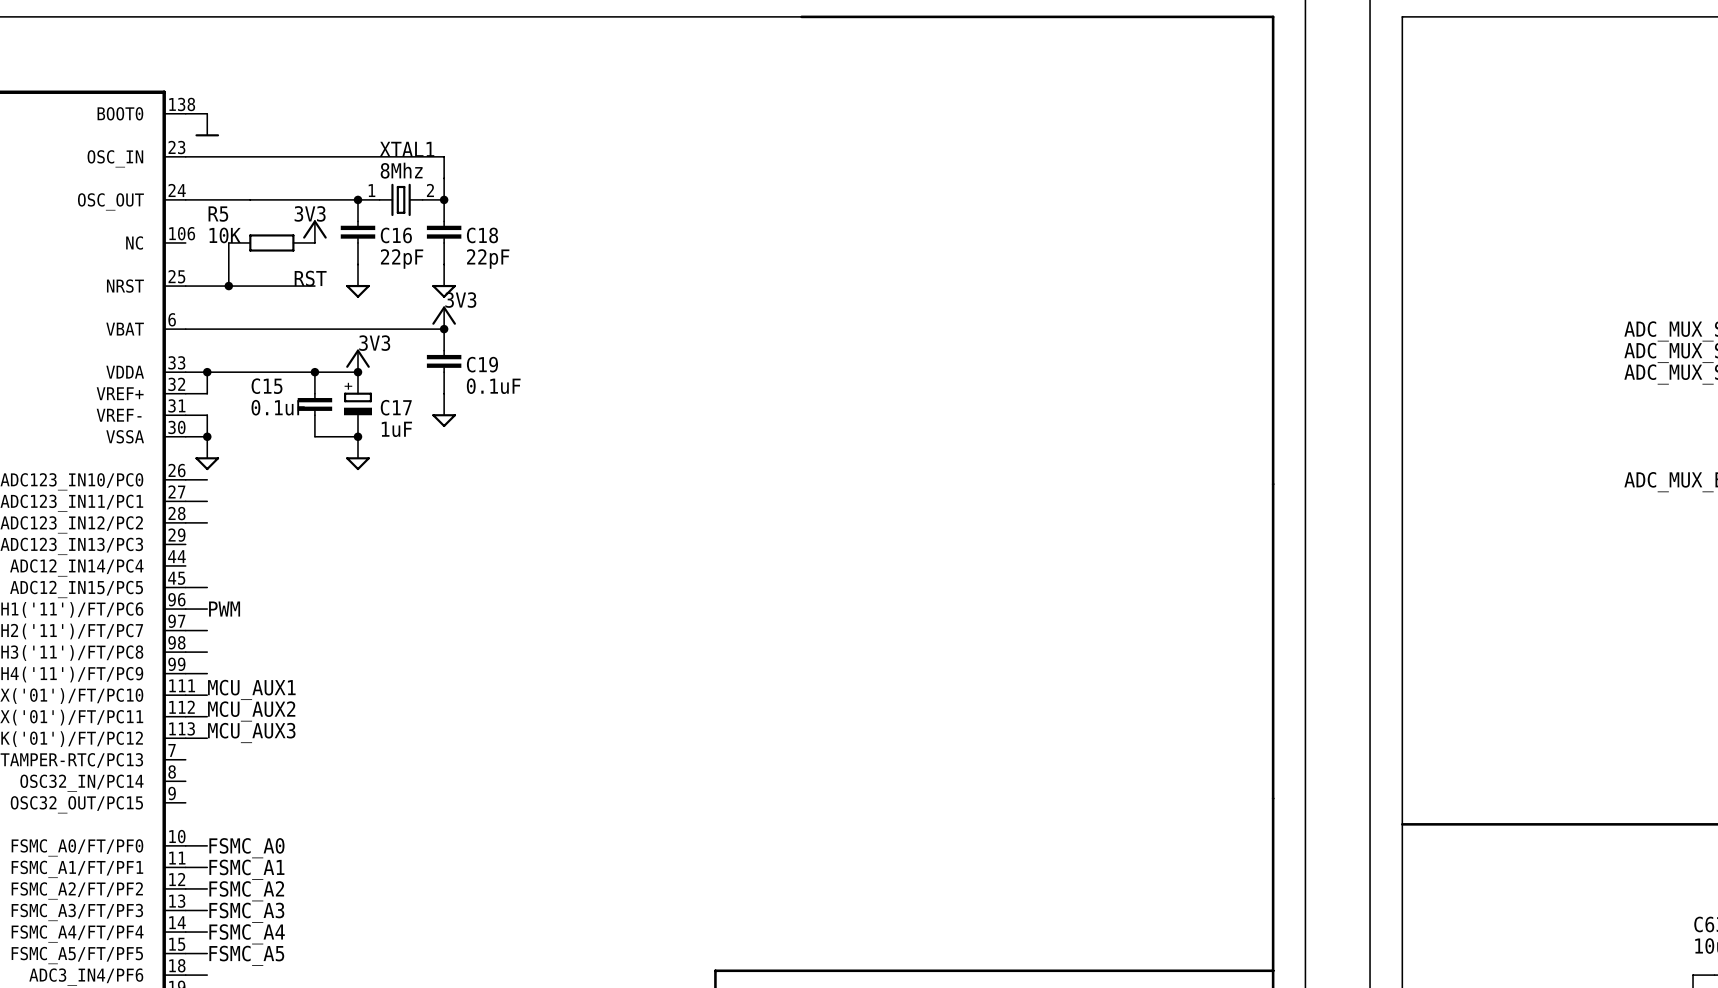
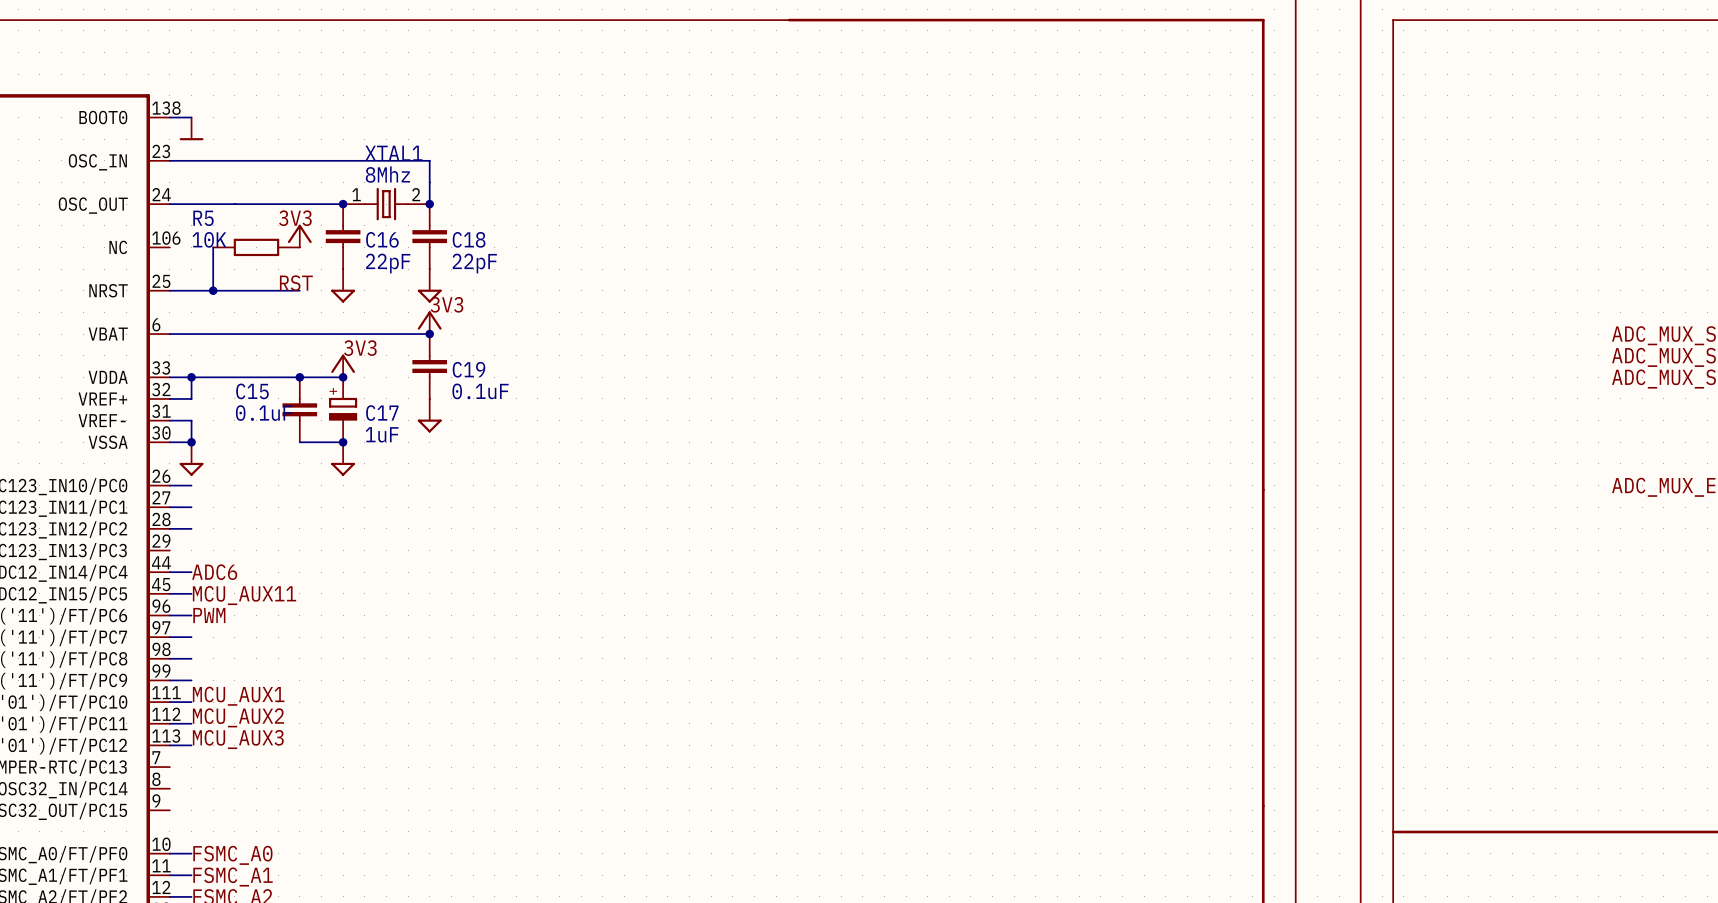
wire: none -> (169, 572) (191, 572)
label: none -> ADC6 (214, 572)
label: none -> MCU_AUX11 (244, 595)

